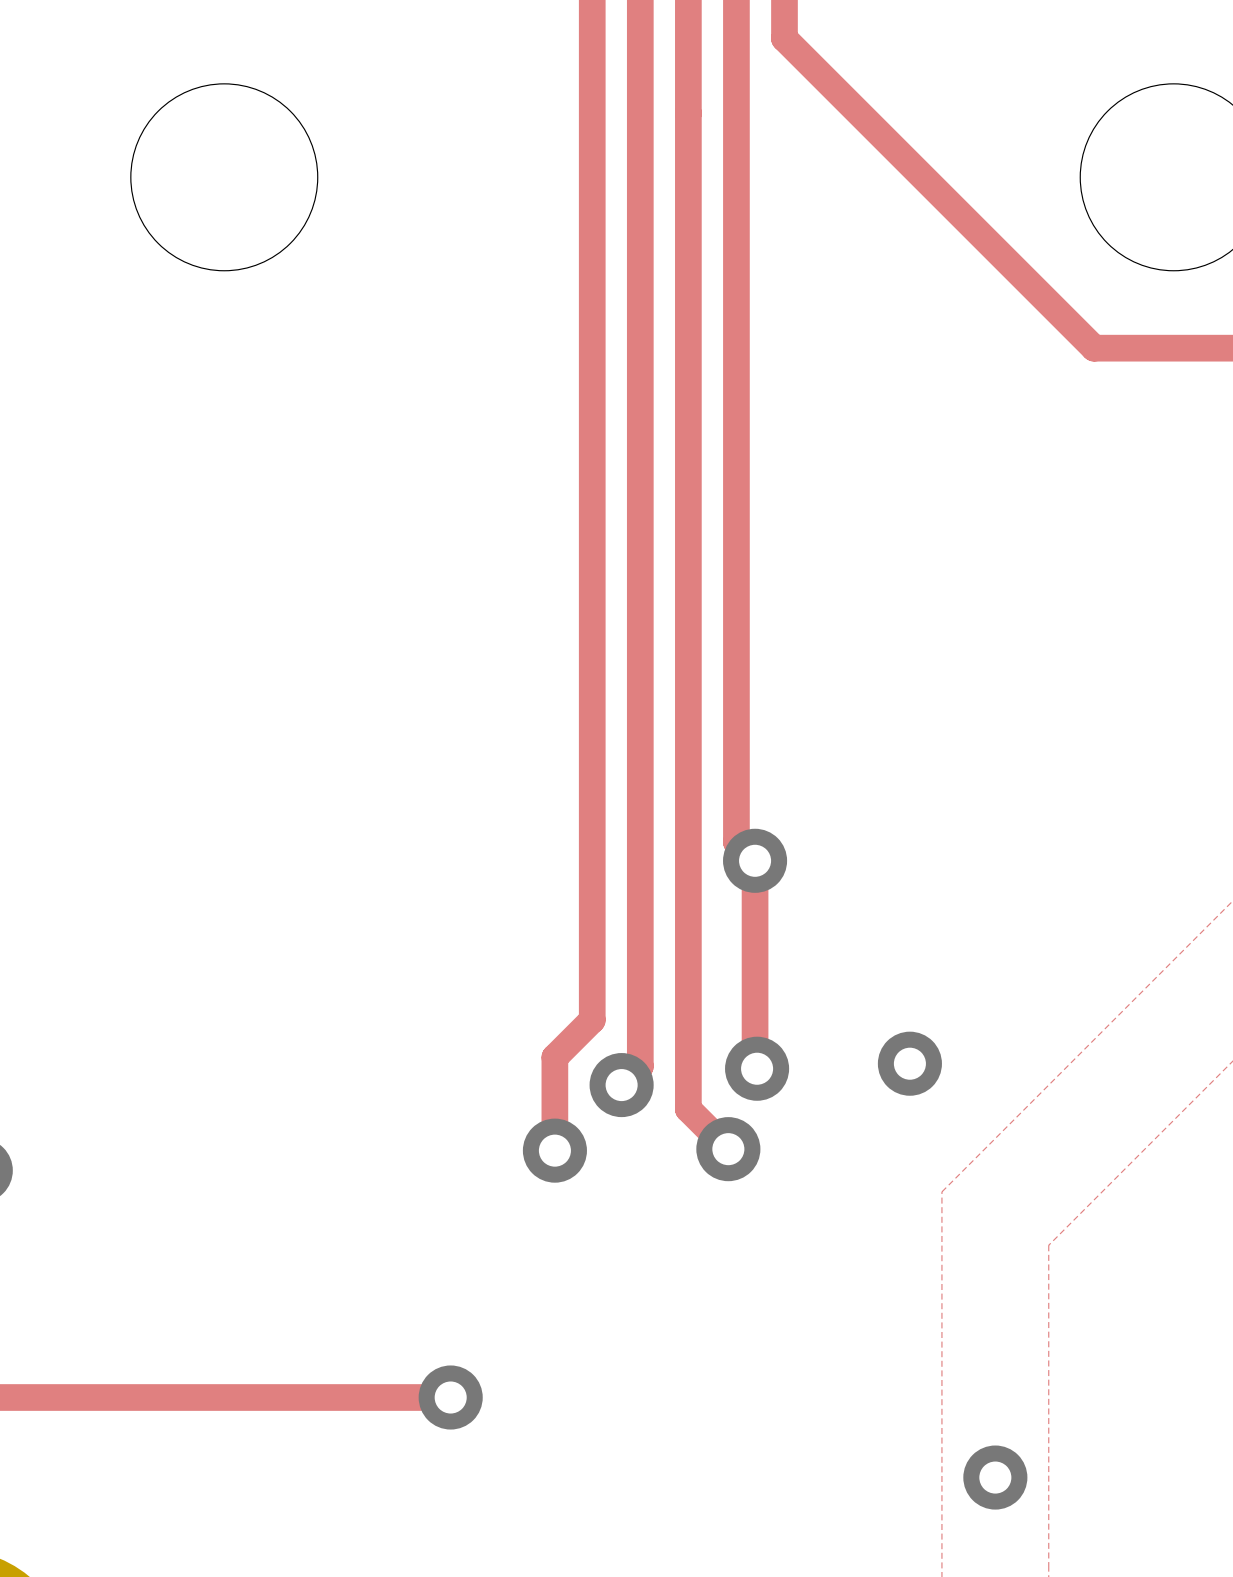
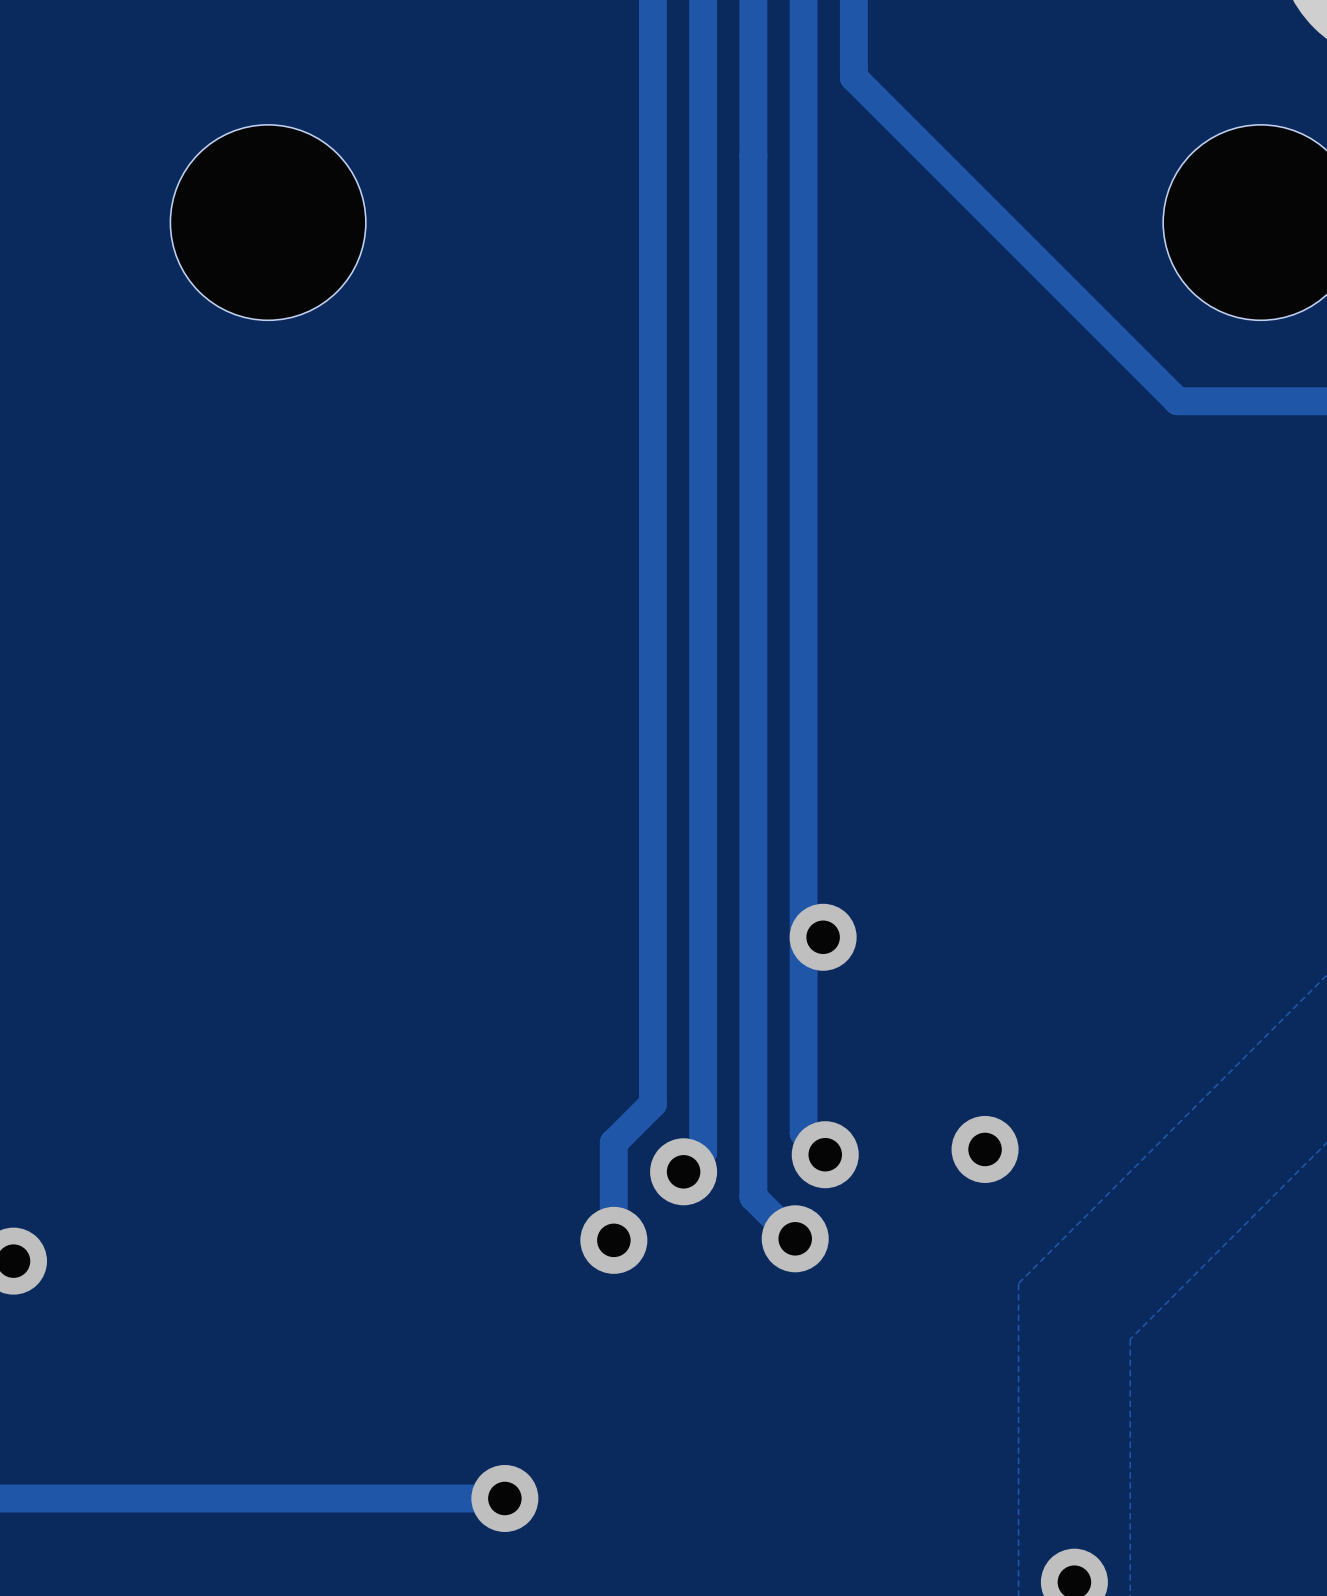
track: (736, 842) (755, 860) (755, 1066) -> (803, 917) (803, 1133) (823, 1152)

